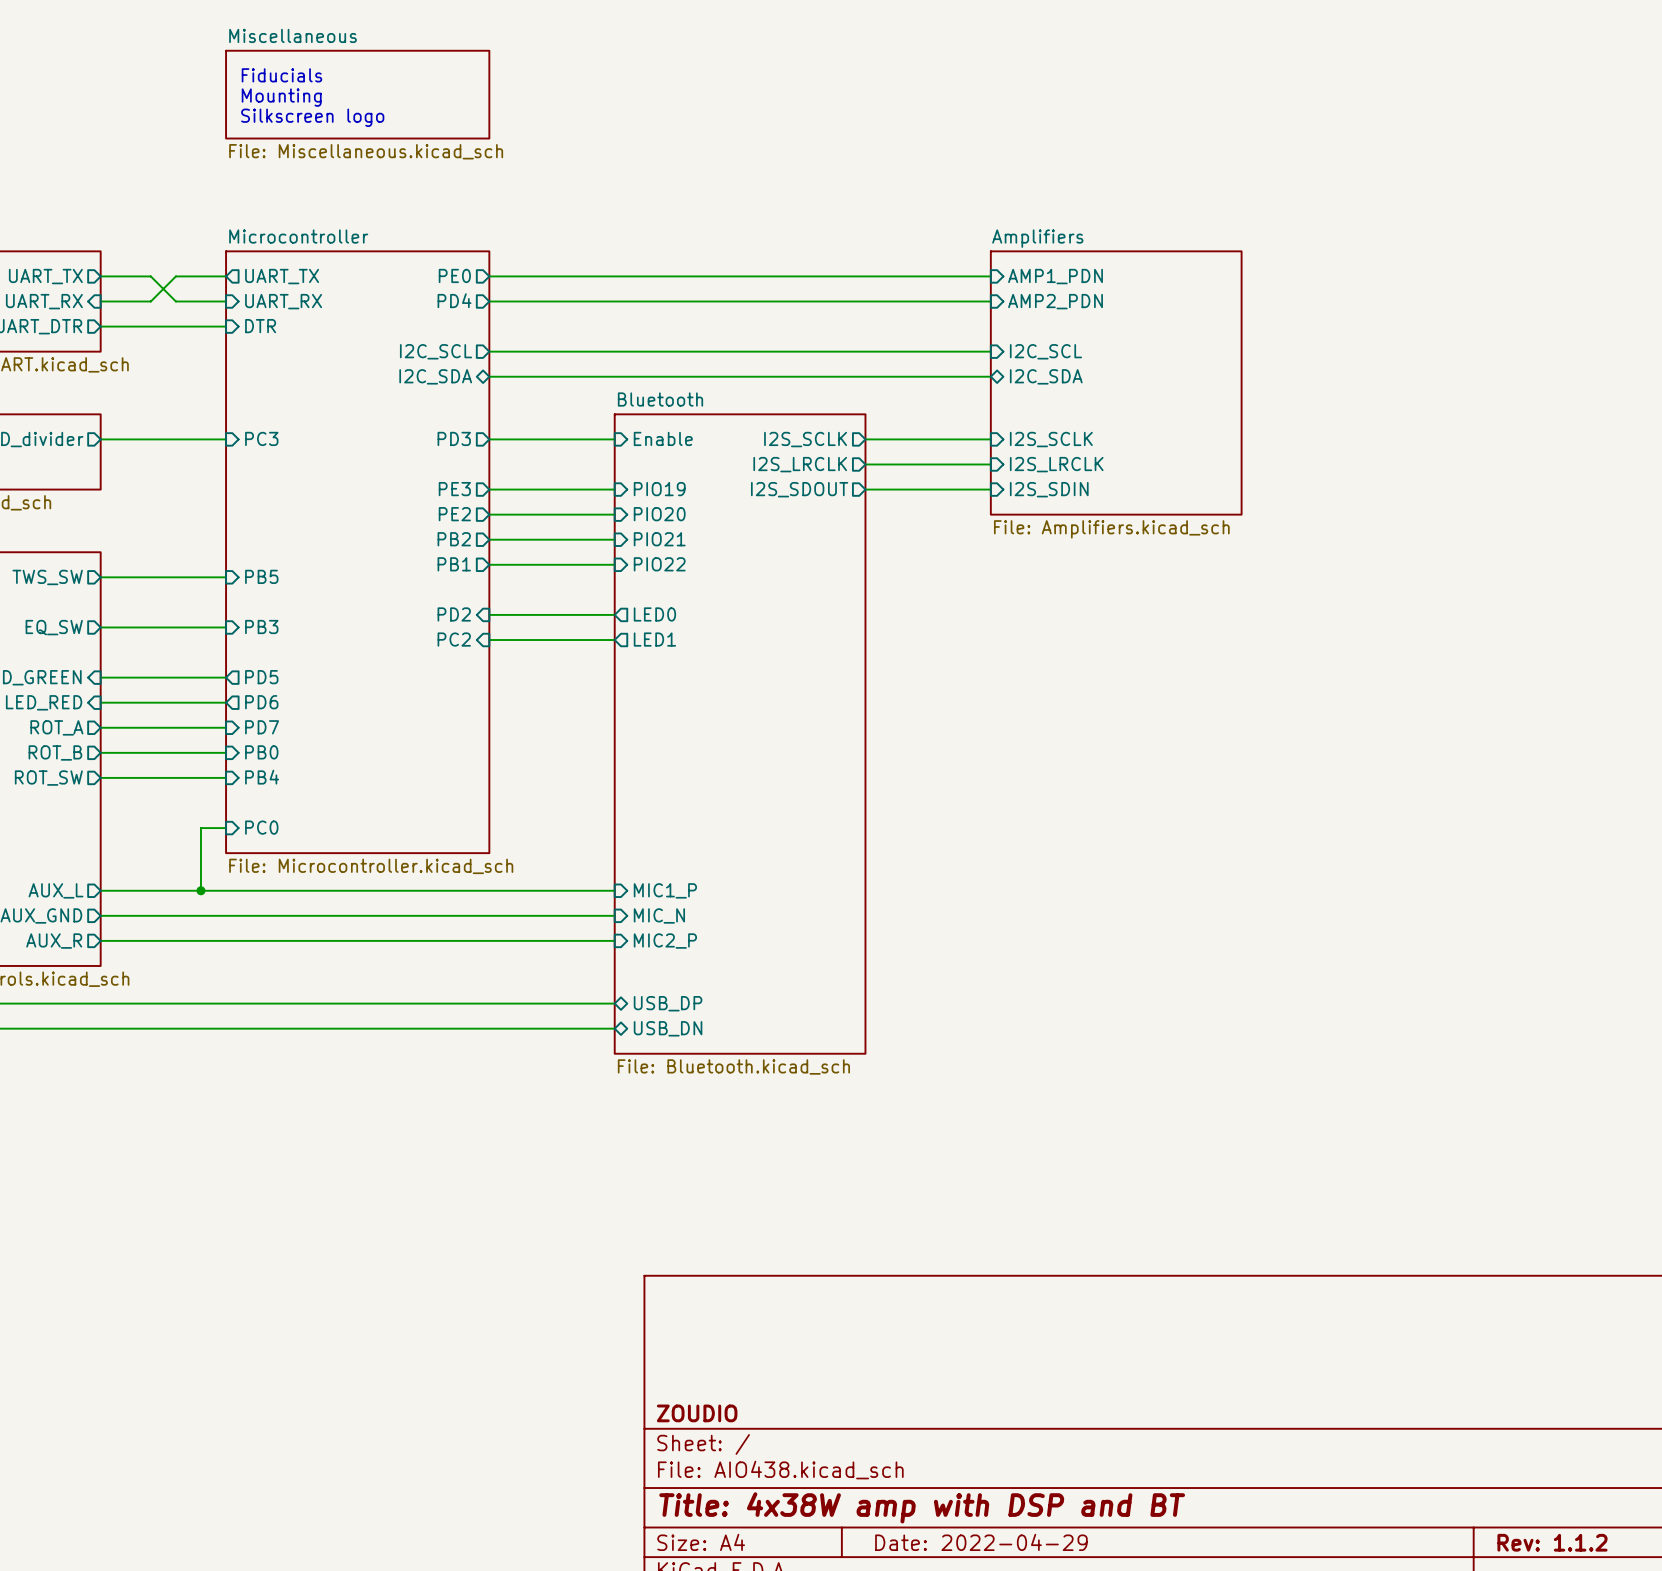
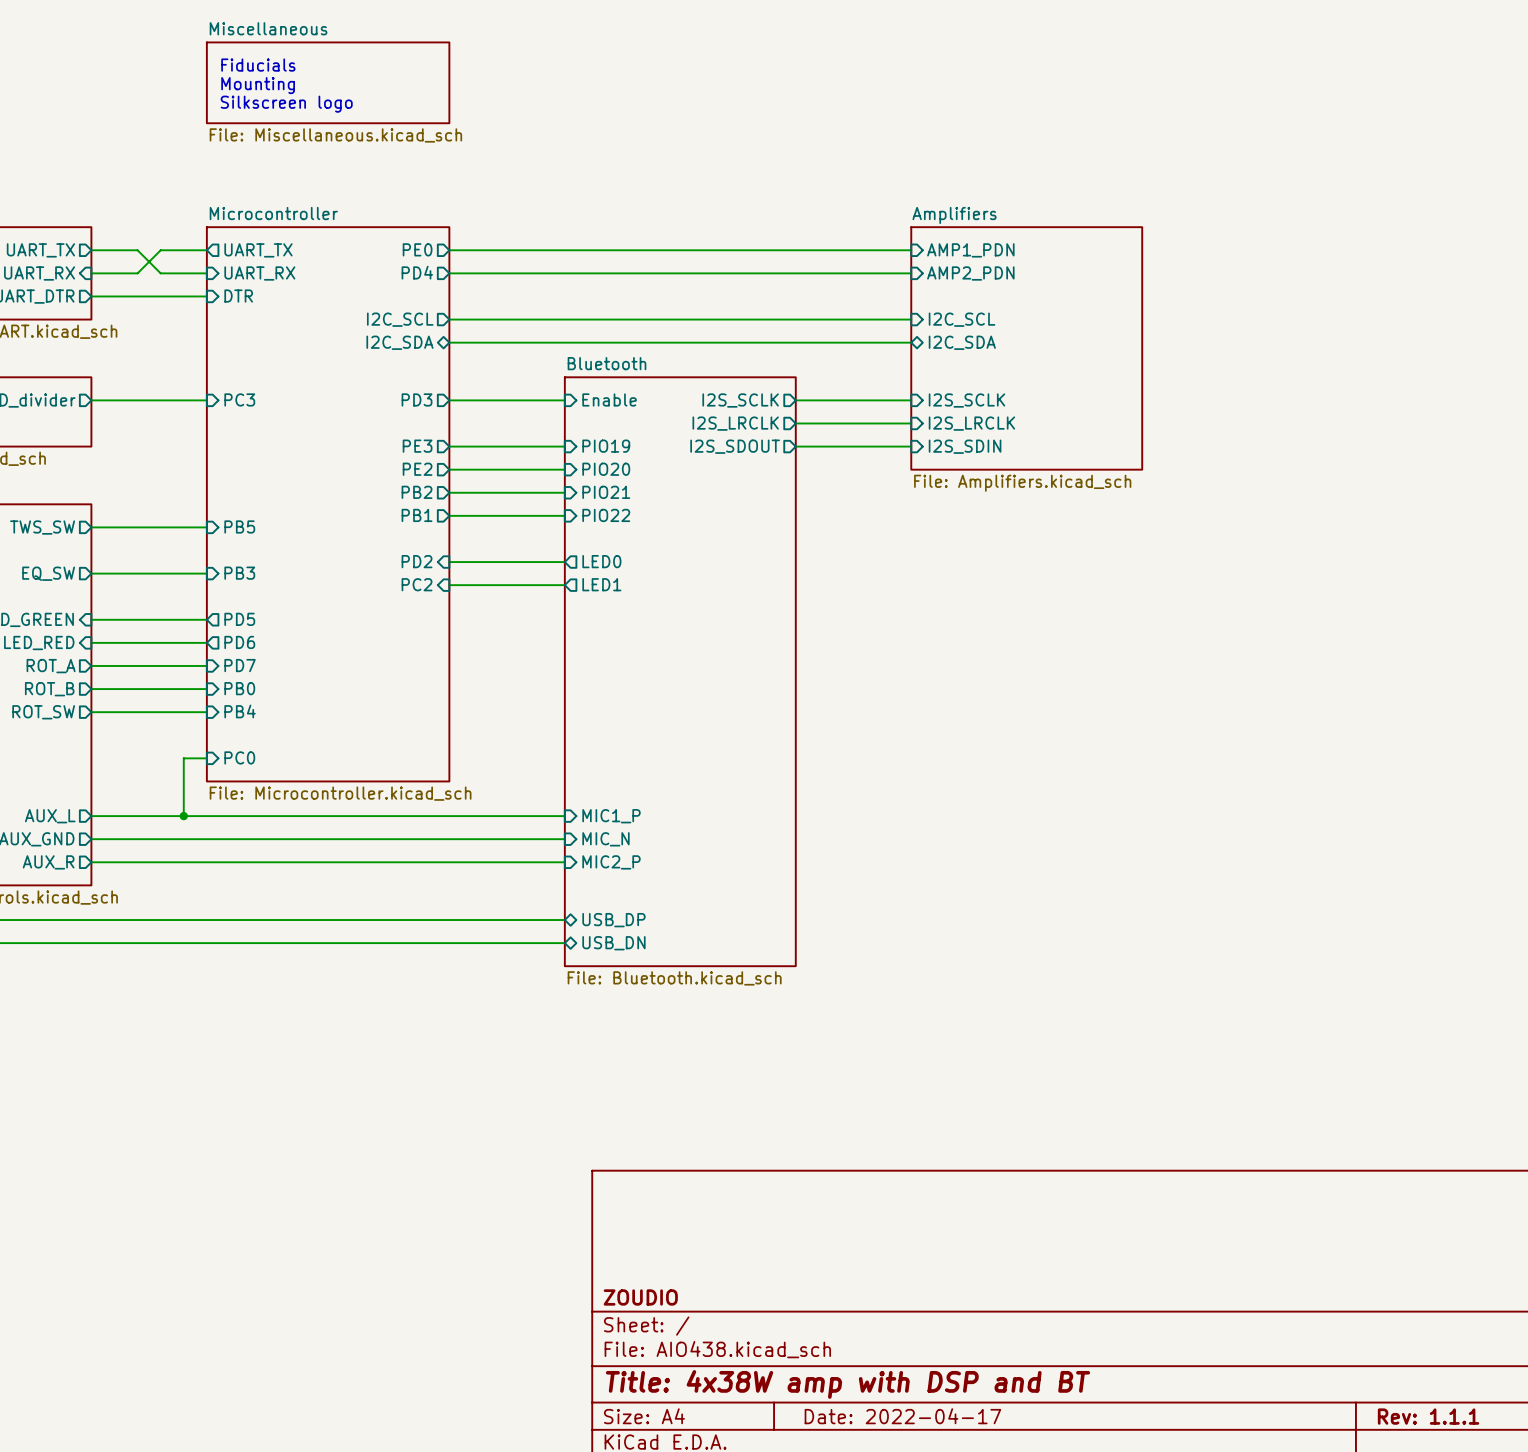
title block: Date: 2022-04-29 (981, 1542) -> Date: 2022-04-17 (902, 1416)
title block: Rev: 1.1.2 (1552, 1542) -> Rev: 1.1.1 (1428, 1416)

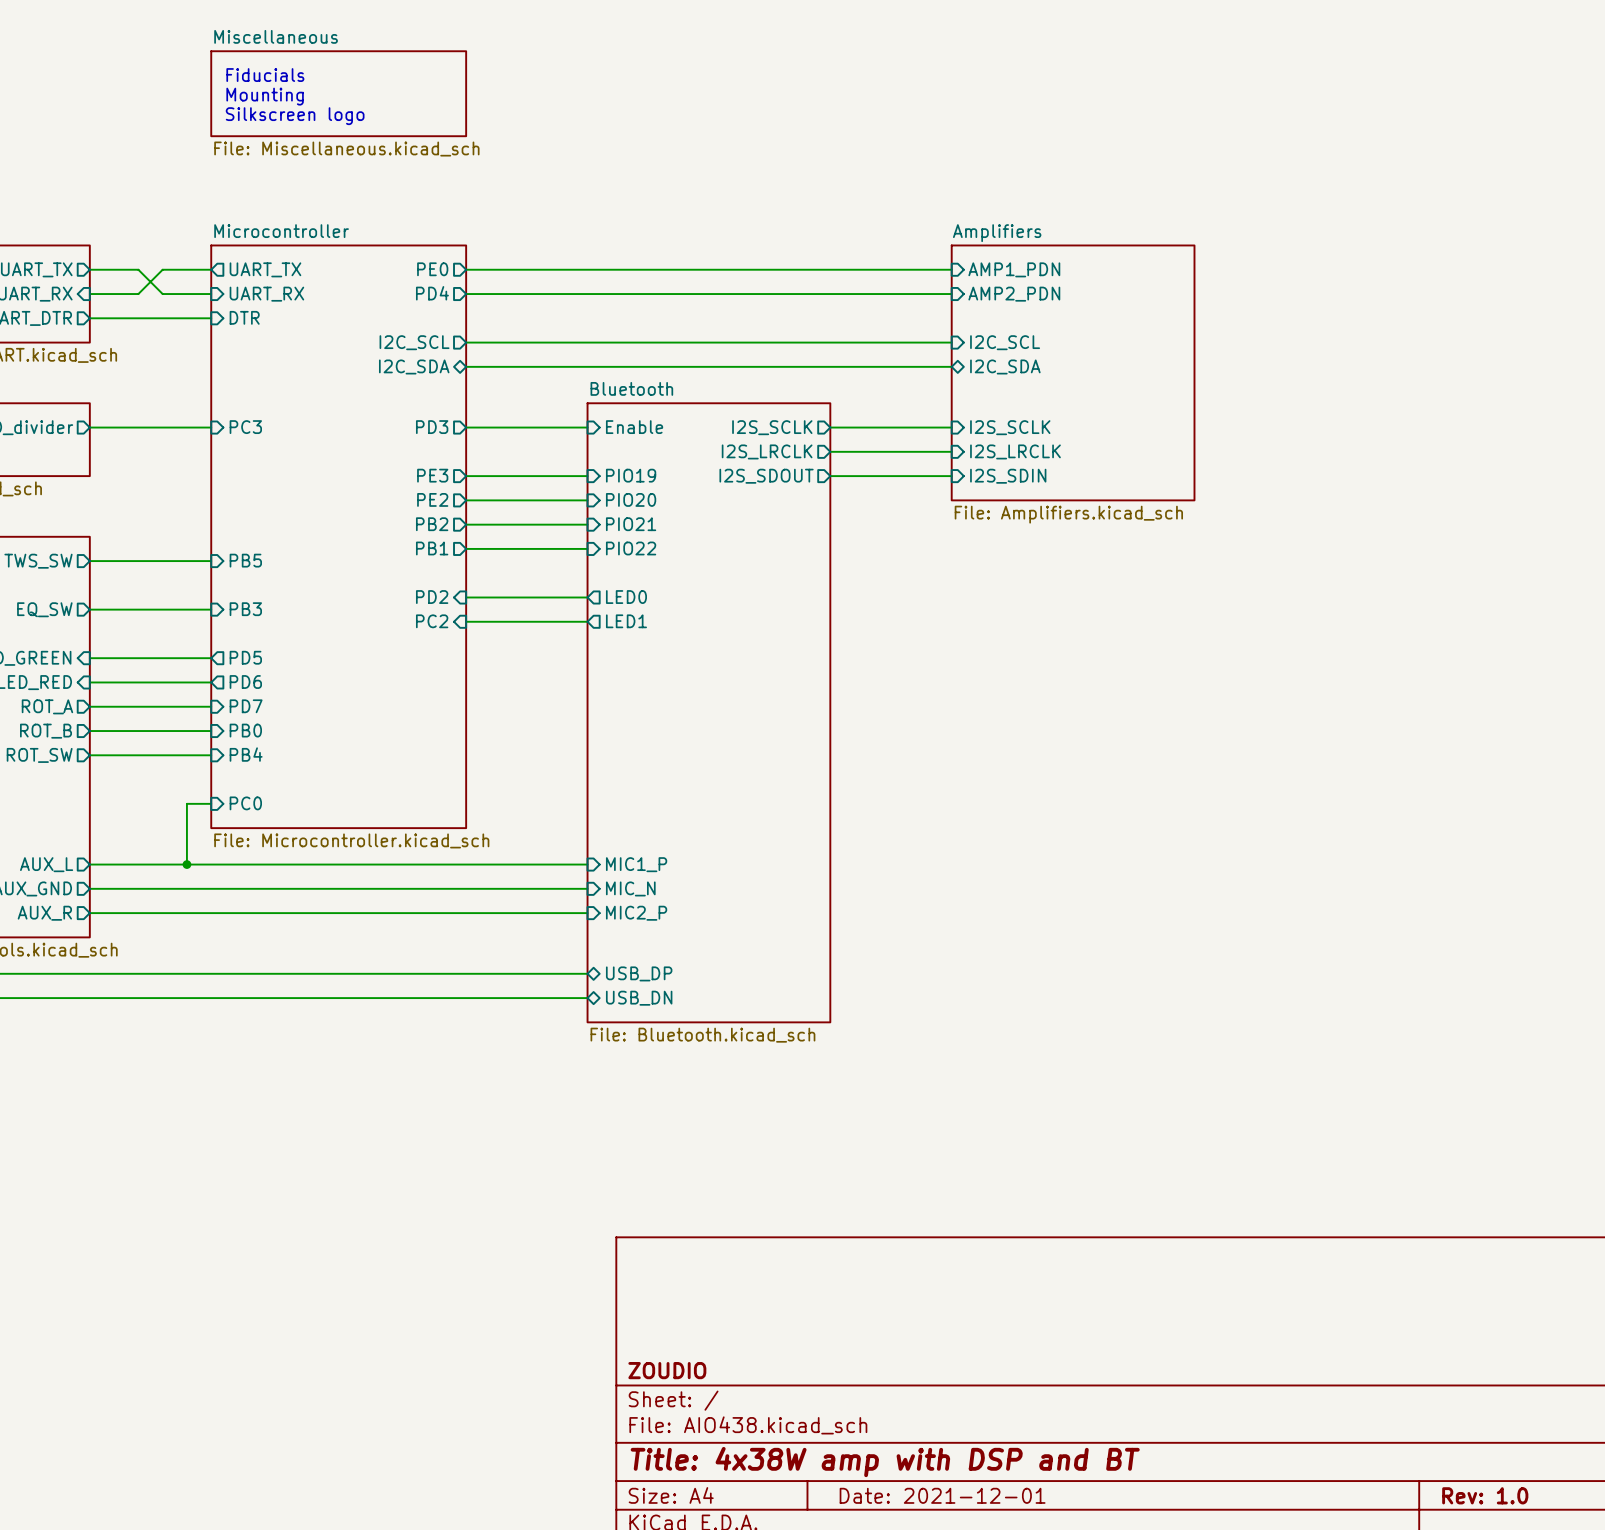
title block: Date: 2022-04-17 (902, 1416) -> Date: 2021-12-01 (942, 1495)
title block: Rev: 1.1.1 (1428, 1416) -> Rev: 1.0 (1485, 1495)

